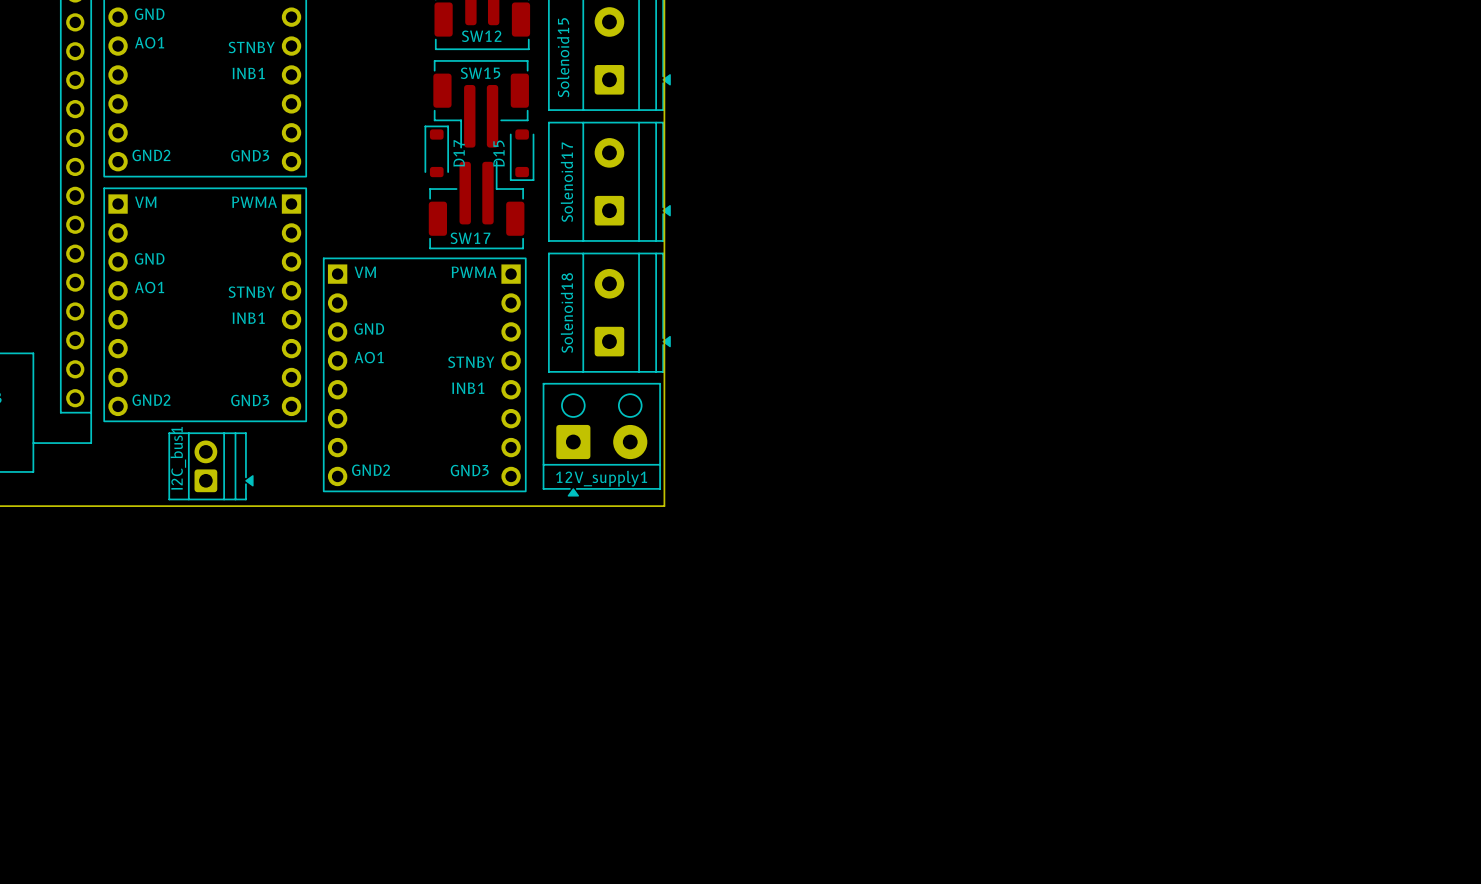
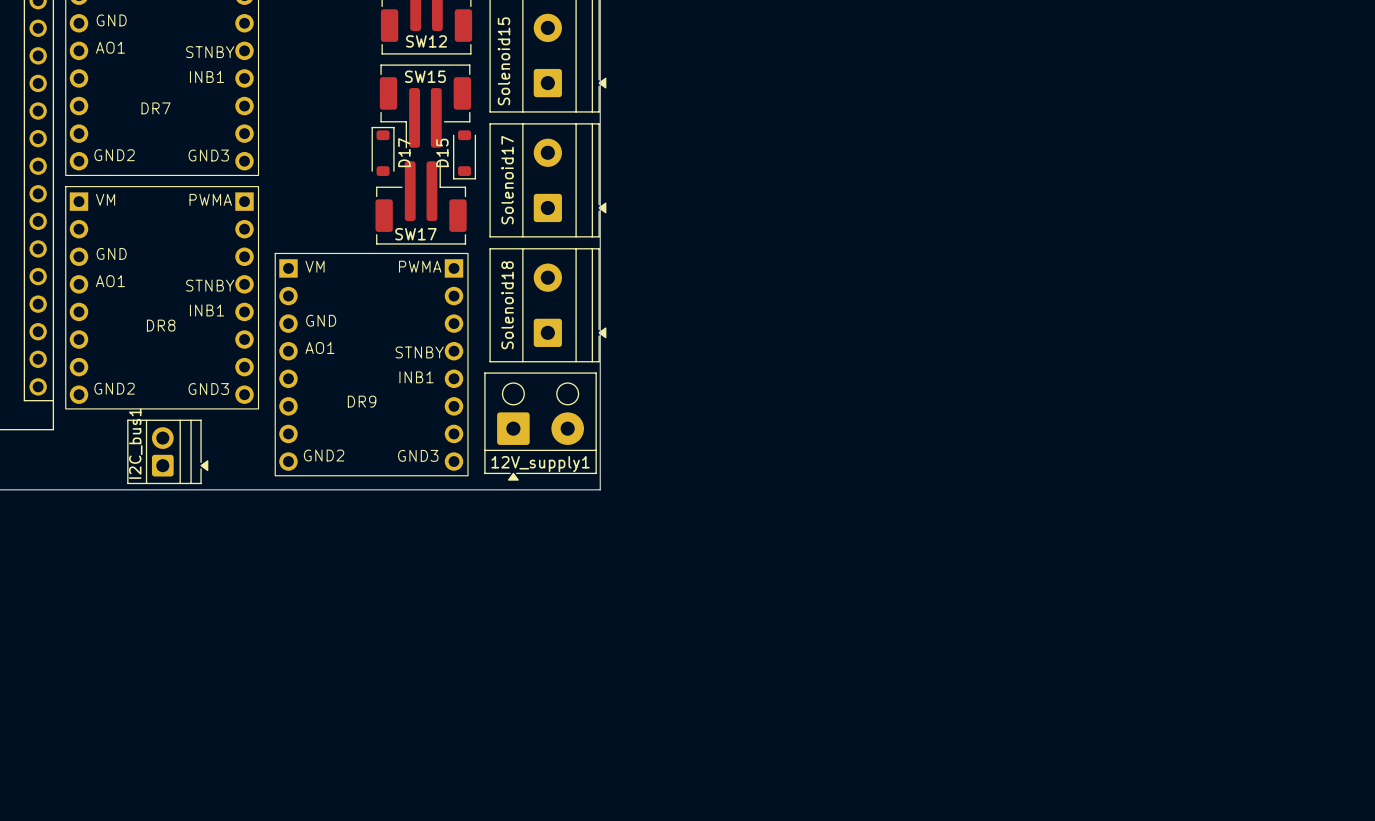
text: none -> DR7 (155, 108)
text: none -> DR8 (161, 325)
text: none -> DR9 (362, 401)

